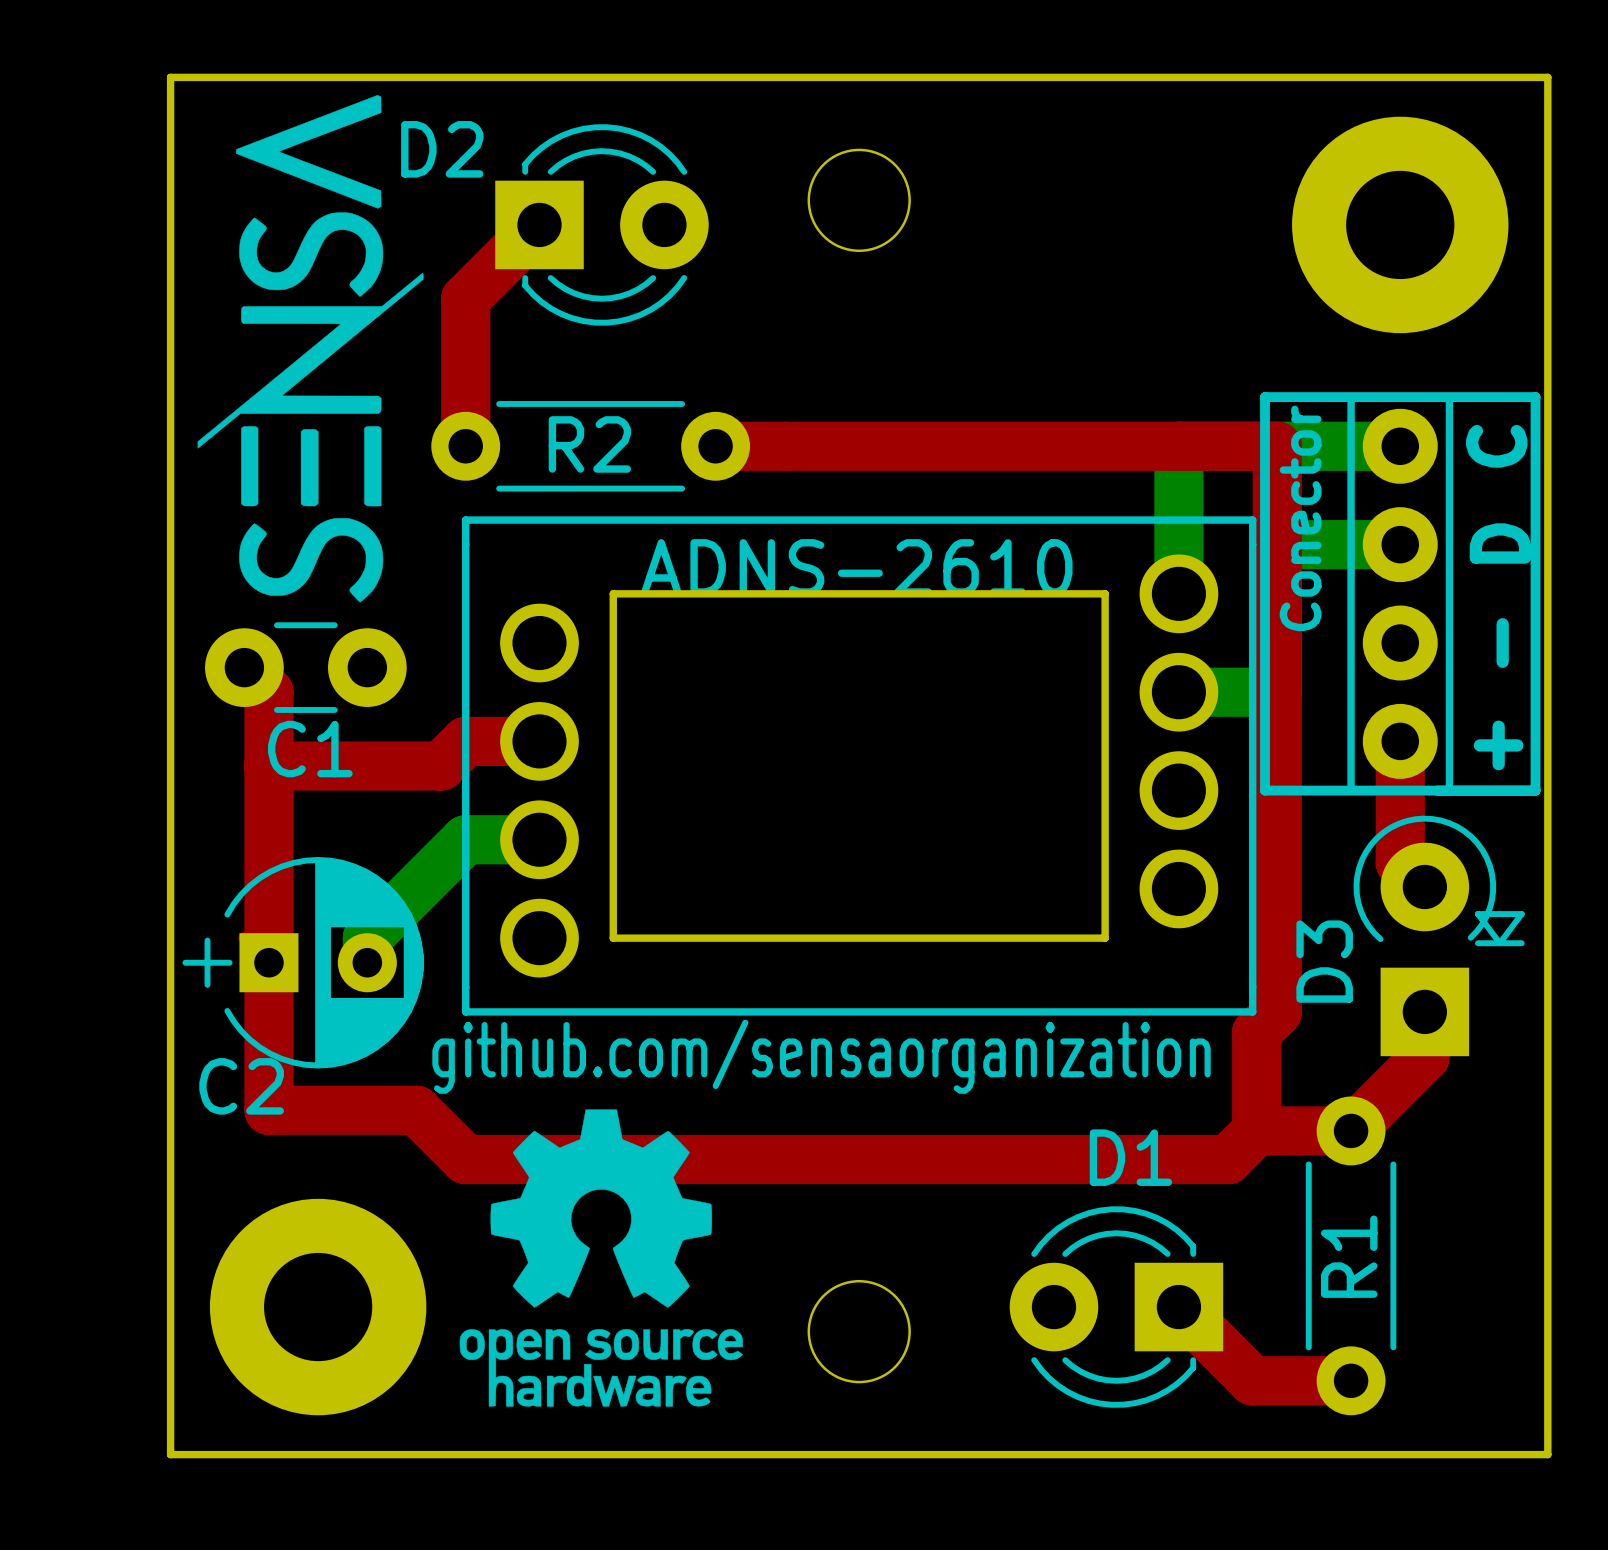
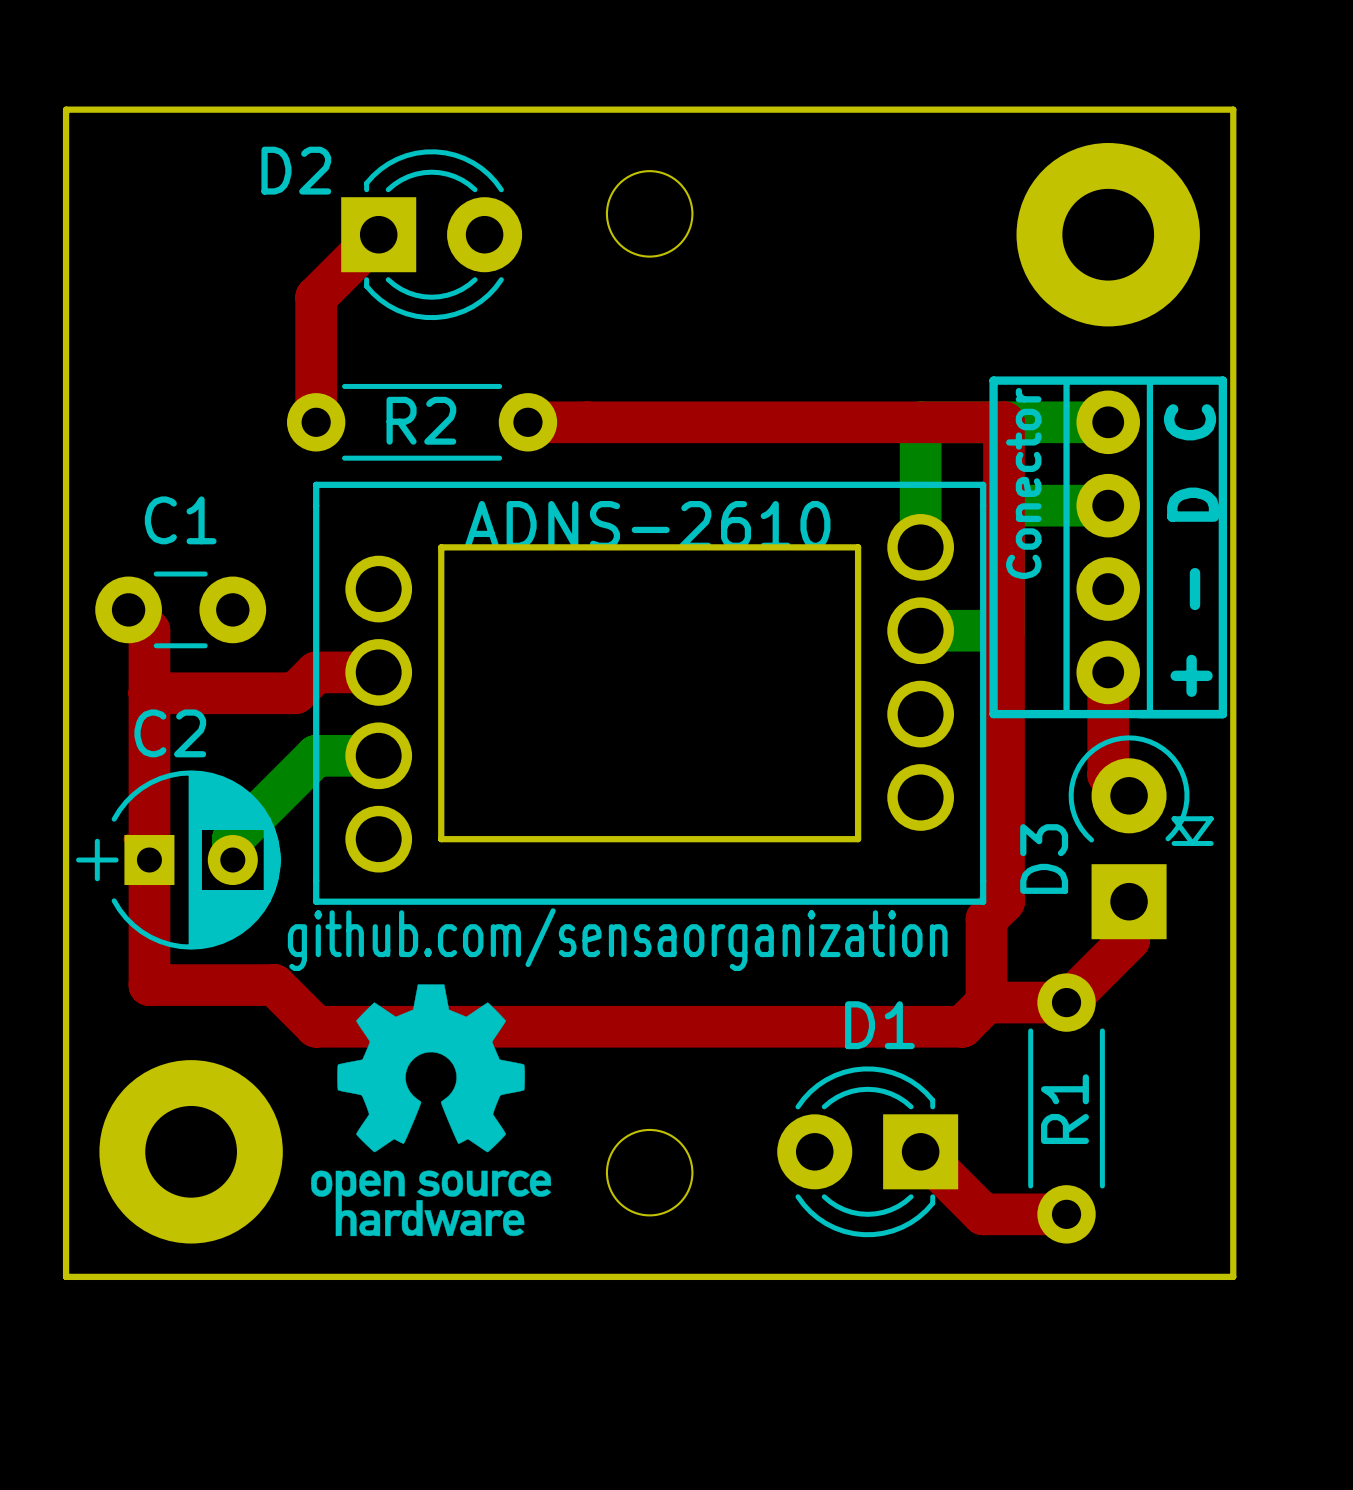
drawing: [197, 95, 424, 603] -> none
C1 name position: C1 (310, 749) -> C1 (180, 520)
C2 name position: C2 (241, 1086) -> C2 (170, 733)

